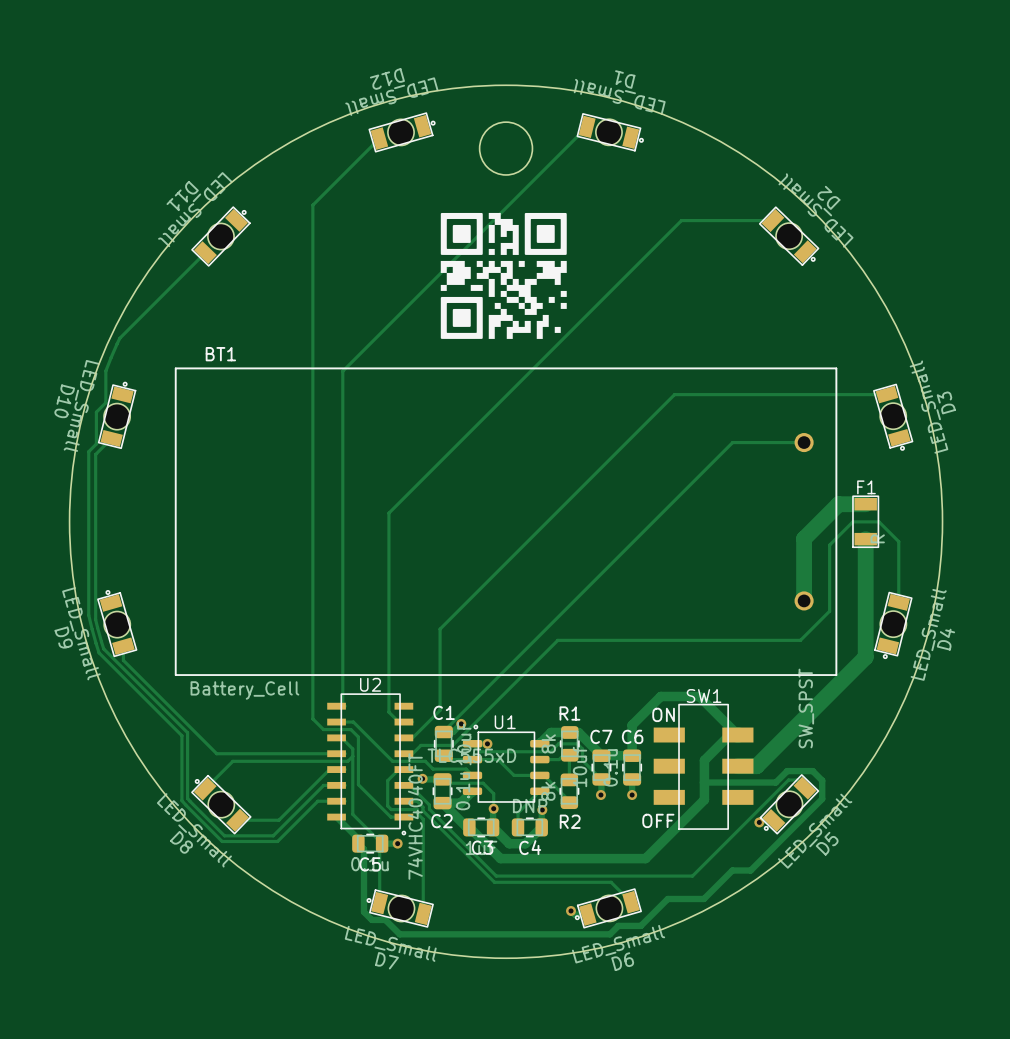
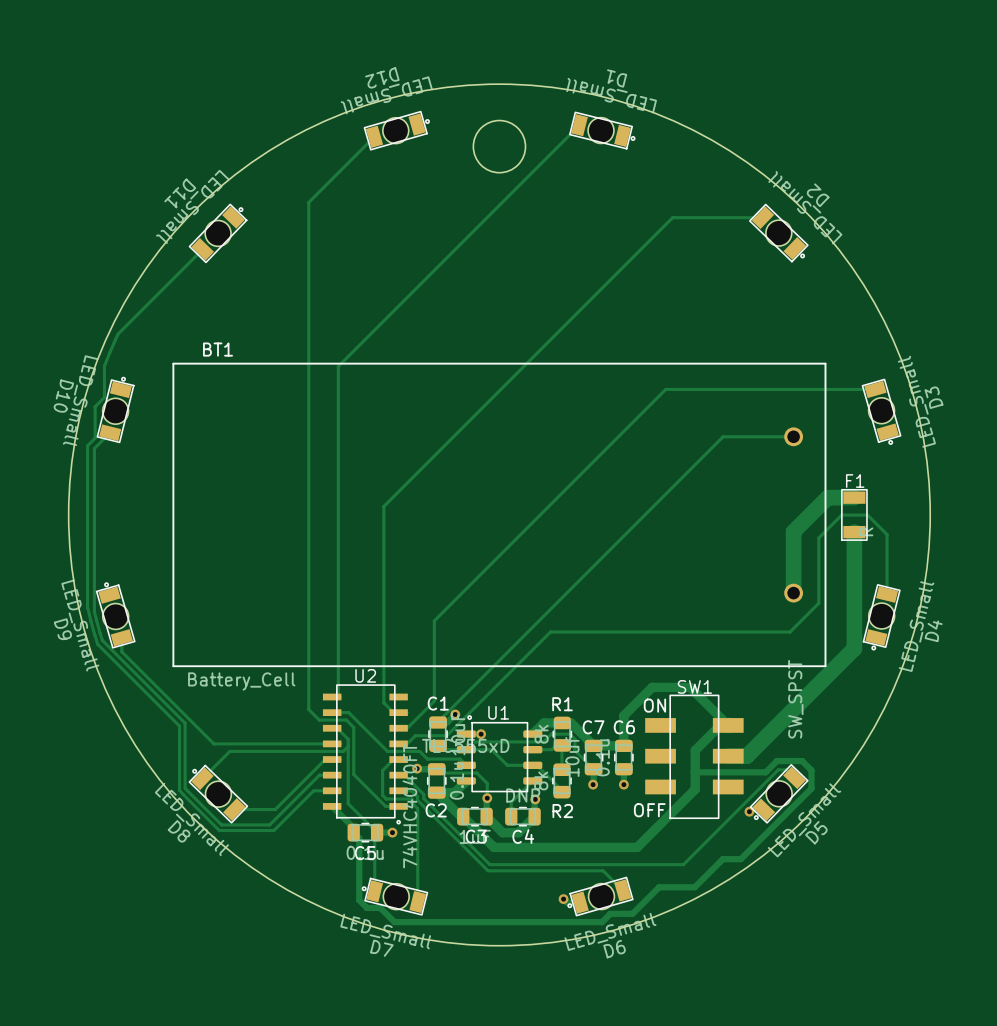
drawing: [440, 212, 567, 339] -> none

